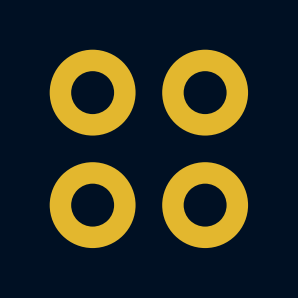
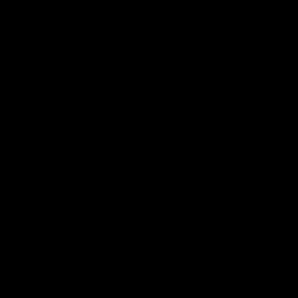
part: (92, 92) -> none
part: (205, 92) -> none
part: (92, 205) -> none
part: (205, 205) -> none

